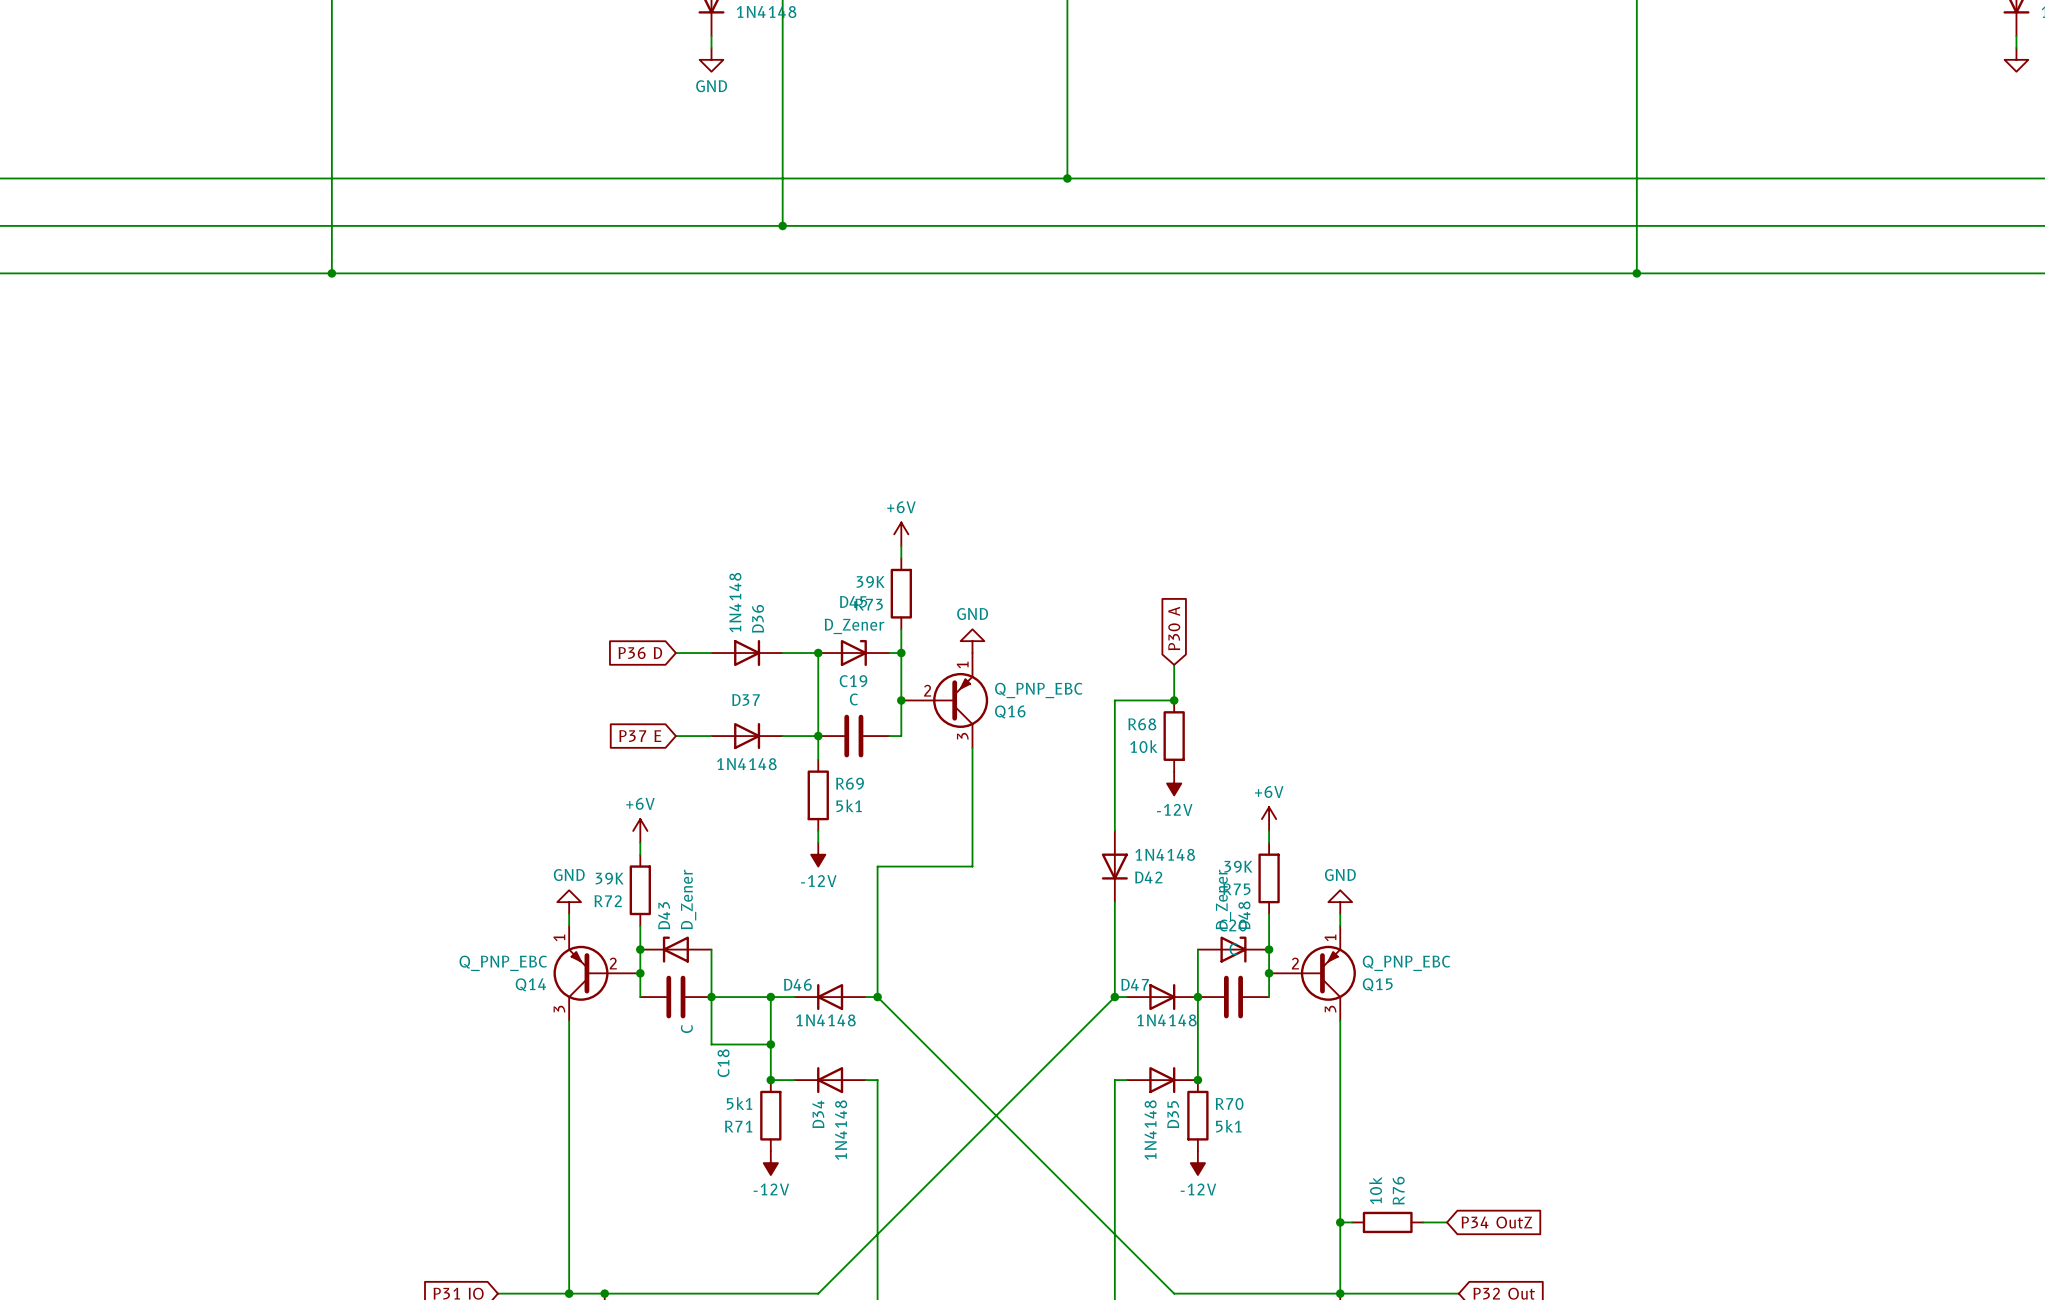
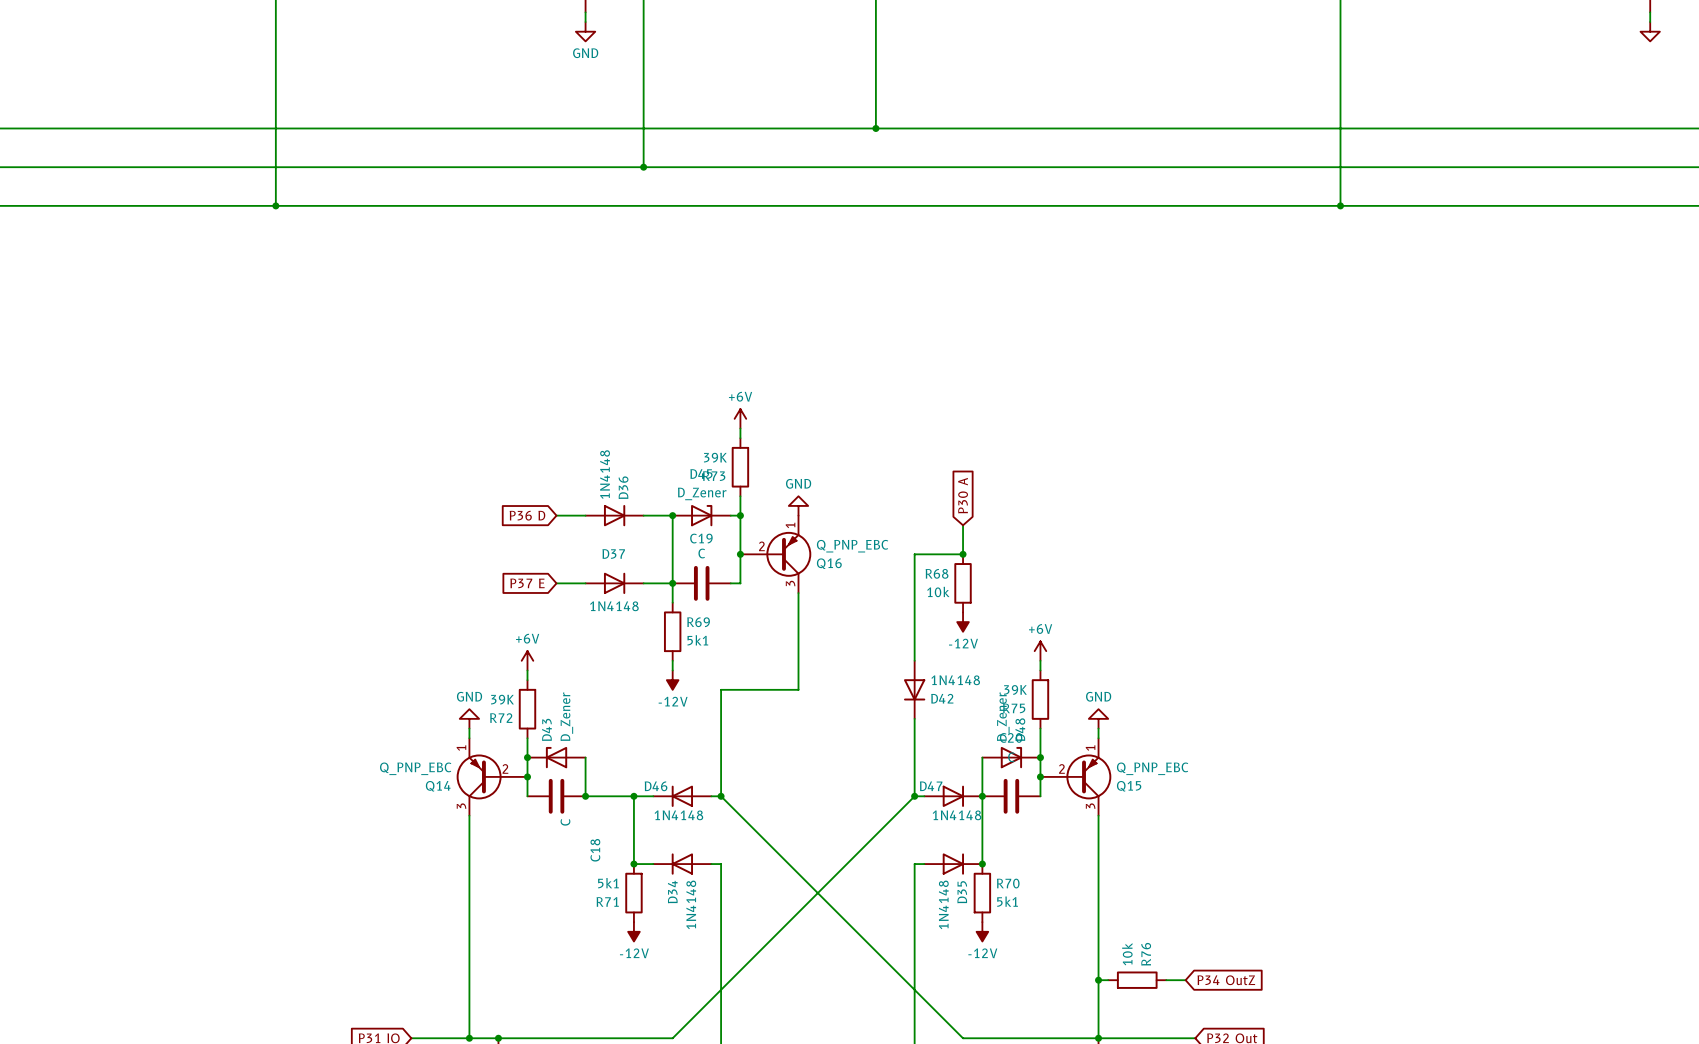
wire: (711, 997) (711, 1044) (770, 1044) -> none
junction: (770, 1044) -> none

